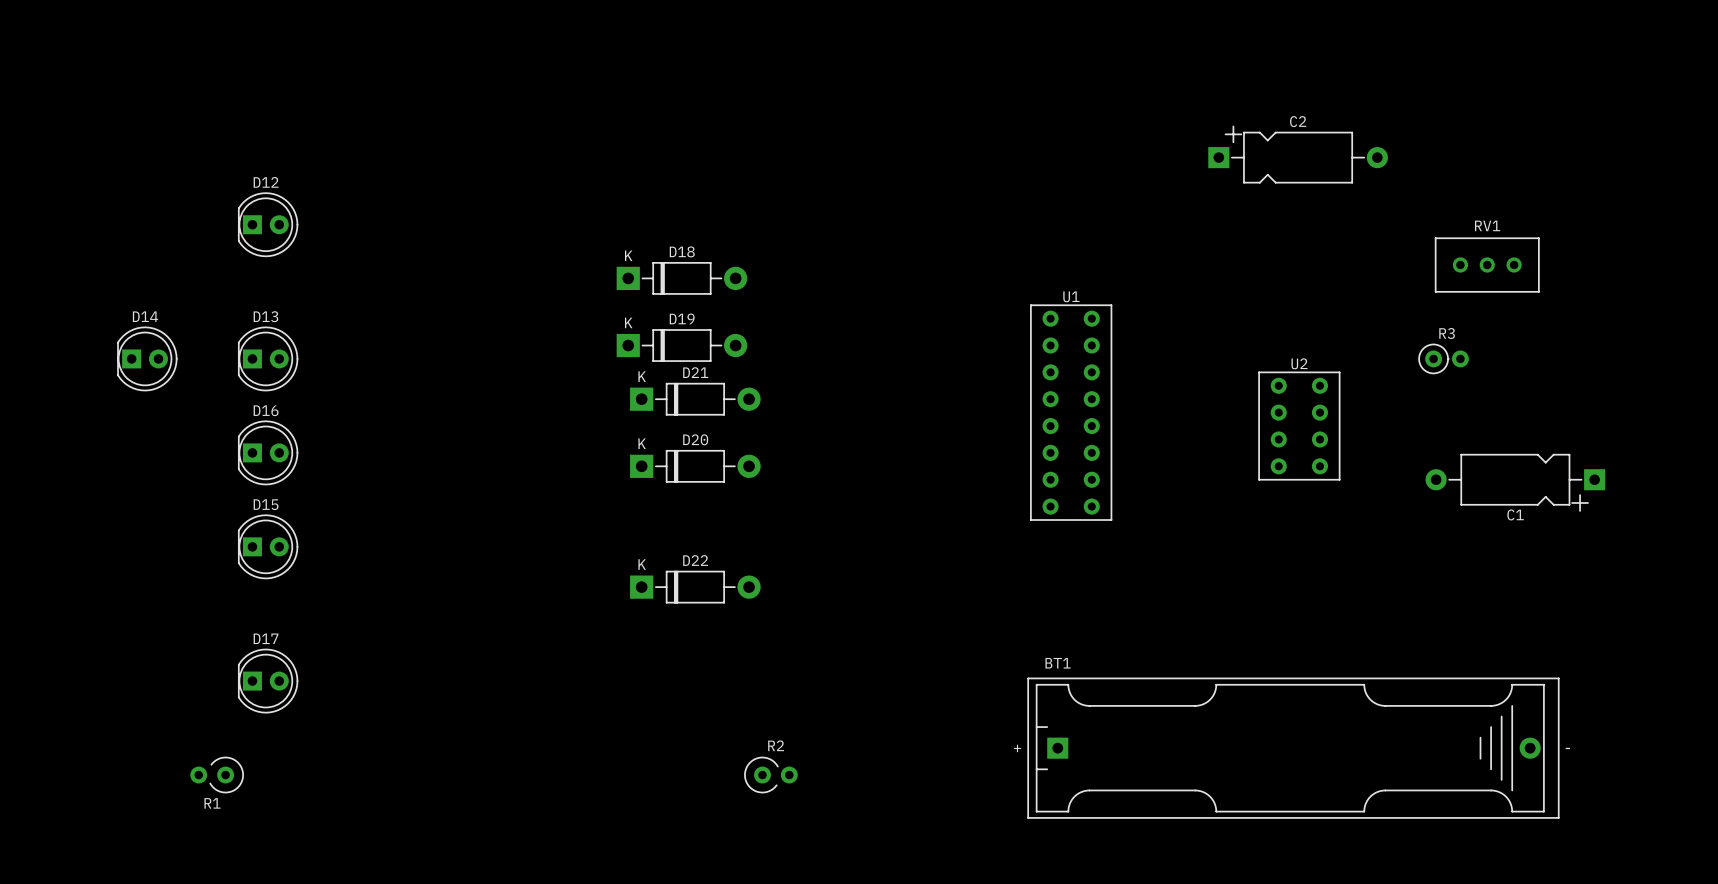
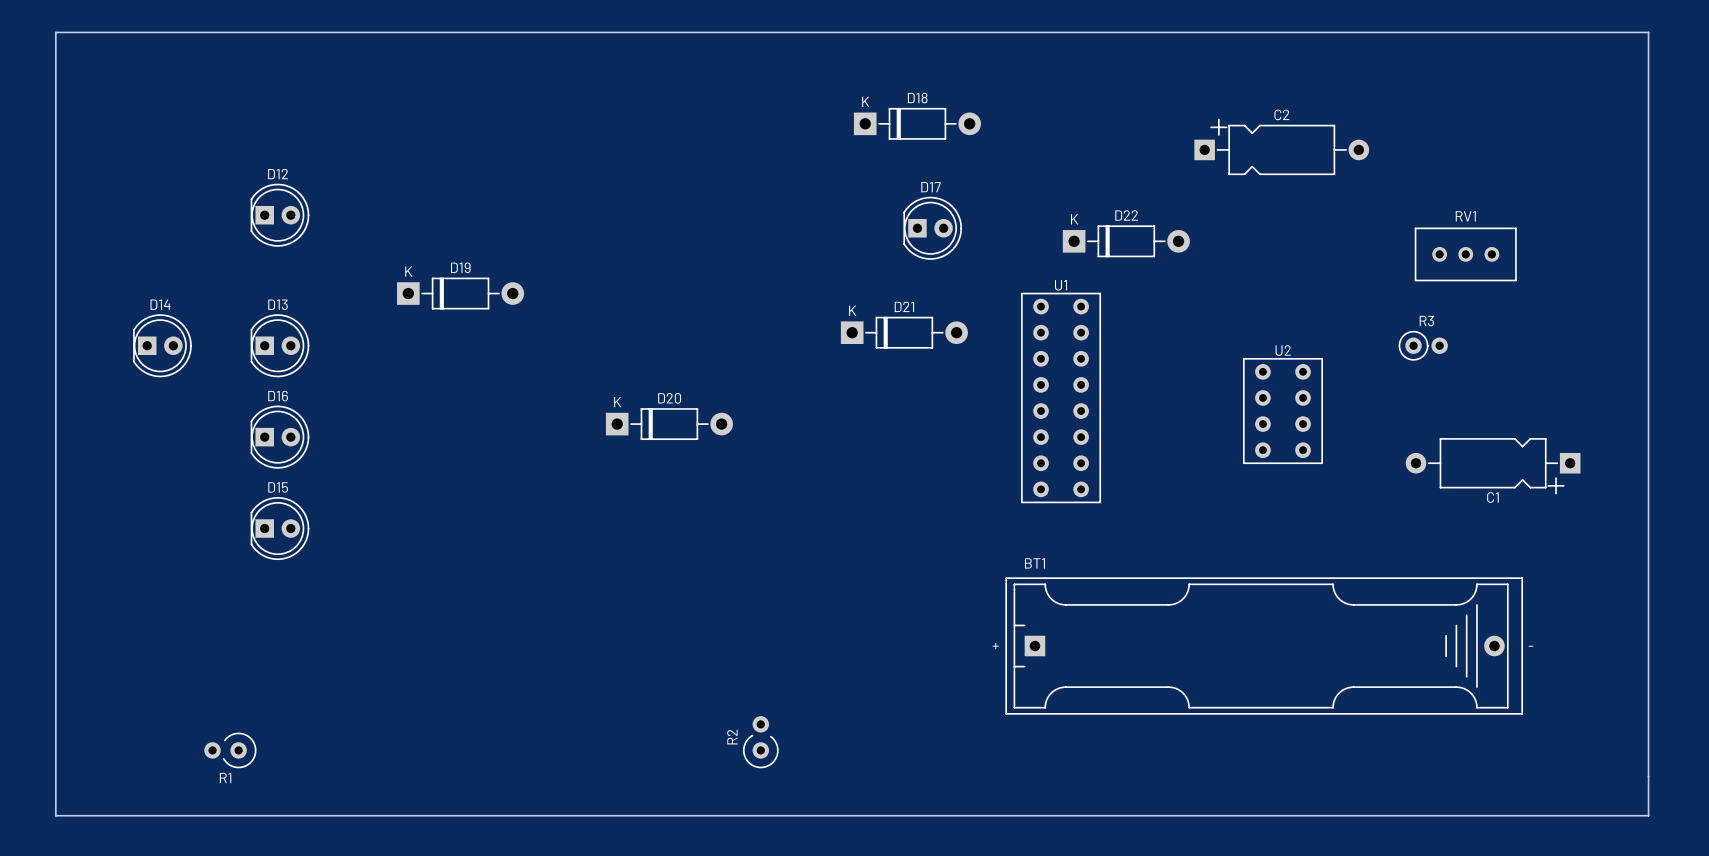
board edge: none -> (55, 32) (1648, 32) (1648, 815) (55, 815) (55, 32)
D18 position: (681, 278) -> (917, 123)
D19 position: (681, 345) -> (460, 293)
D21 position: (695, 399) -> (904, 332)
D20 position: (695, 466) -> (669, 424)
D22 position: (695, 587) -> (1126, 241)
D17 position: (268, 681) -> (932, 228)
BT1 position: (1293, 748) -> (1264, 646)
R2 rotation: 0° (771, 775) -> 90° counterclockwise (760, 742)

